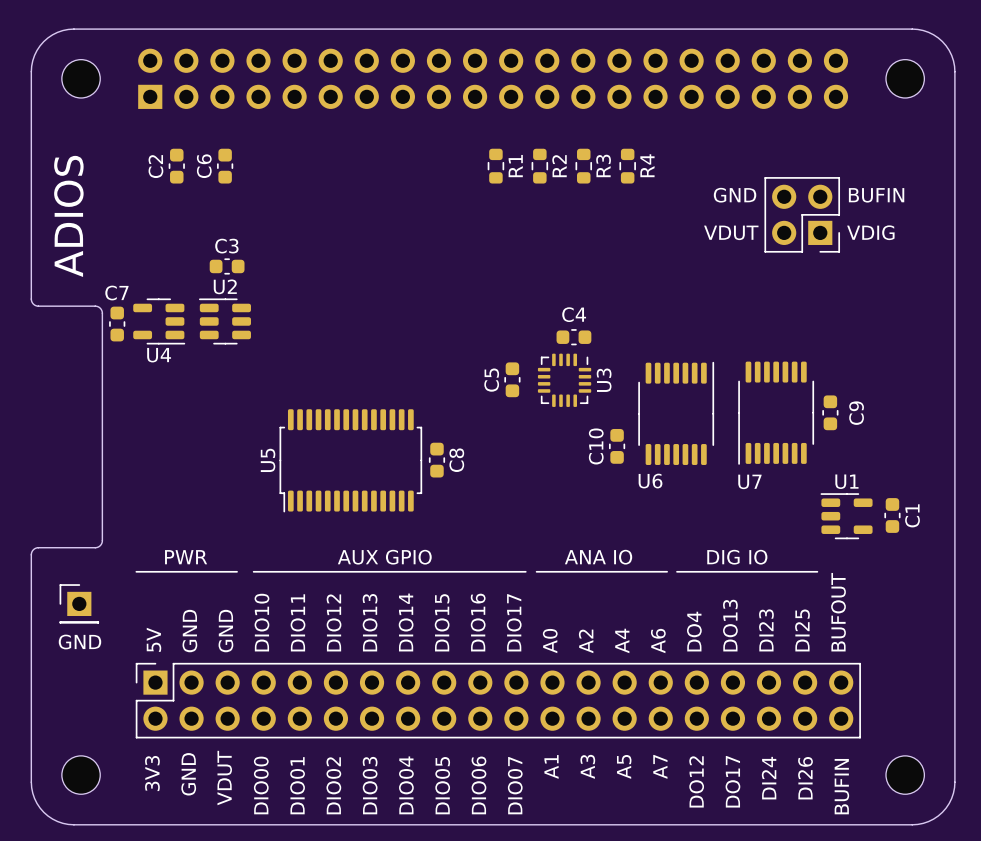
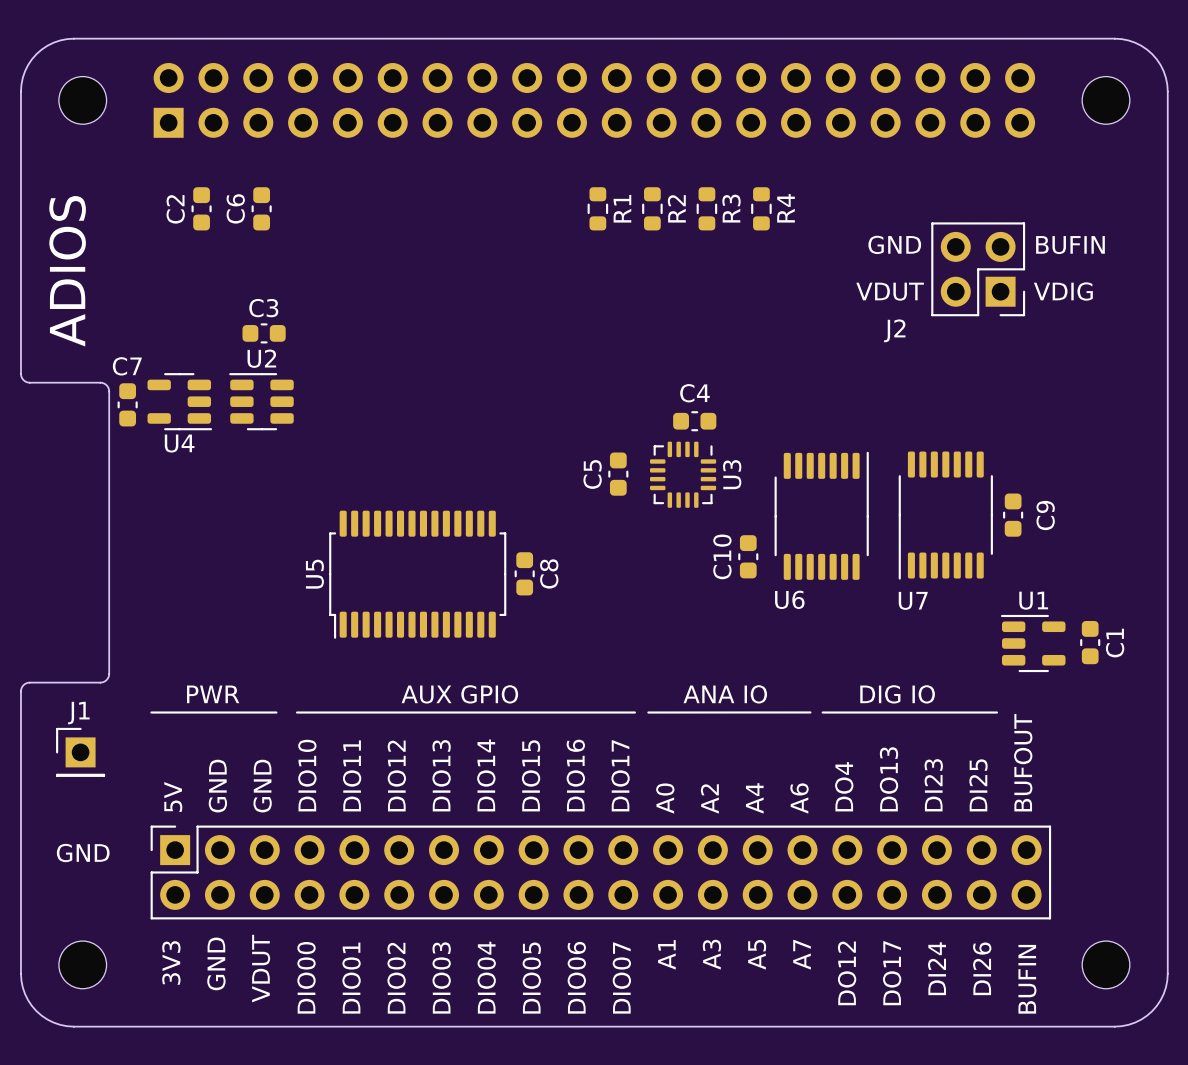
J2 name: none -> J2 (894, 330)
J1 name: none -> J1 (78, 713)
text position: GND (79, 642) -> GND (83, 853)

